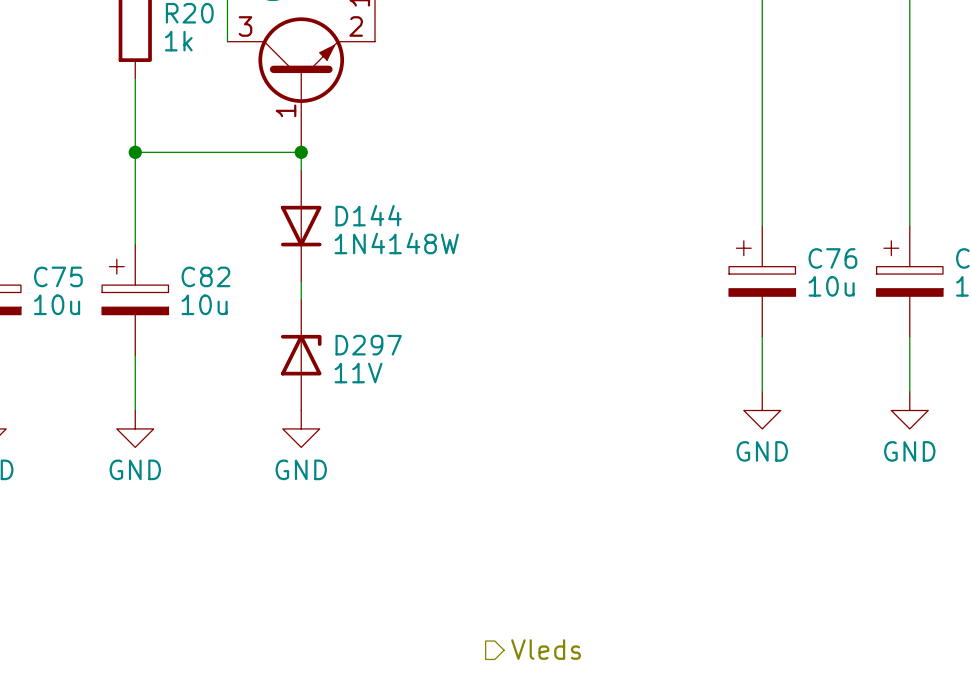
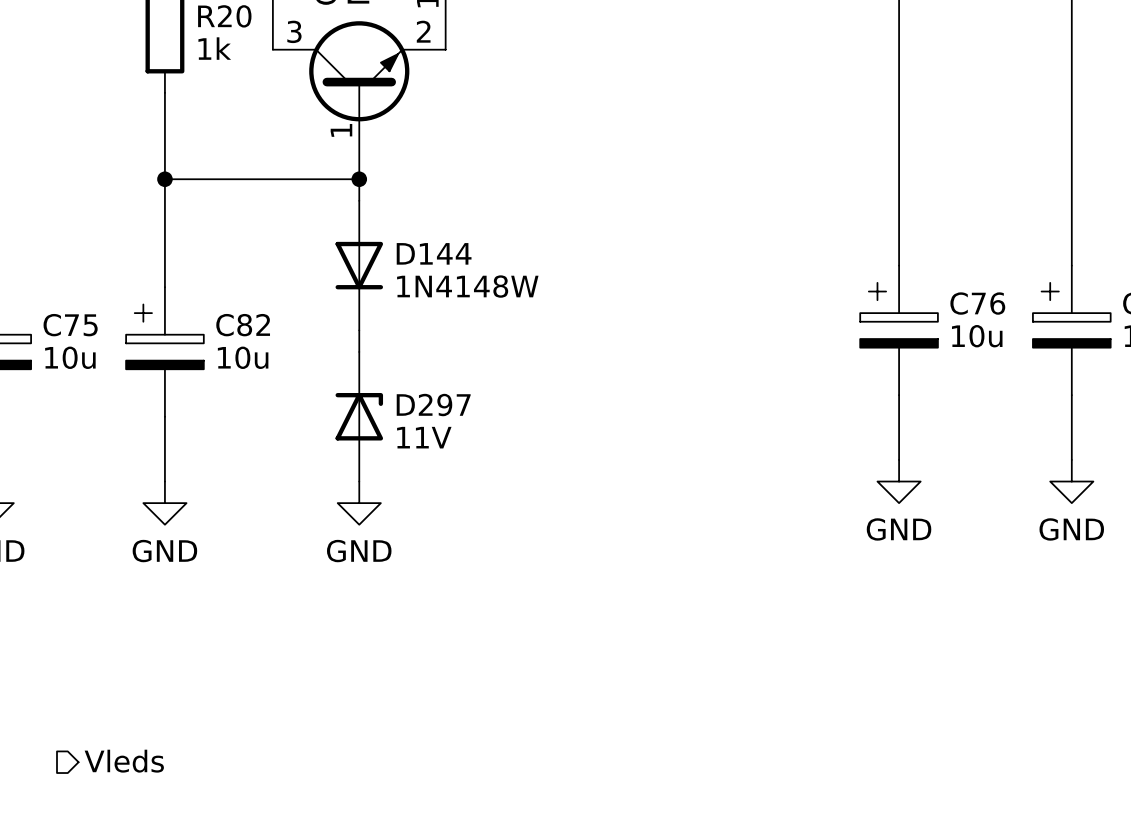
hierarchical label: none -> Vleds (124, 761)
hierarchical label: Vleds (546, 649) -> none

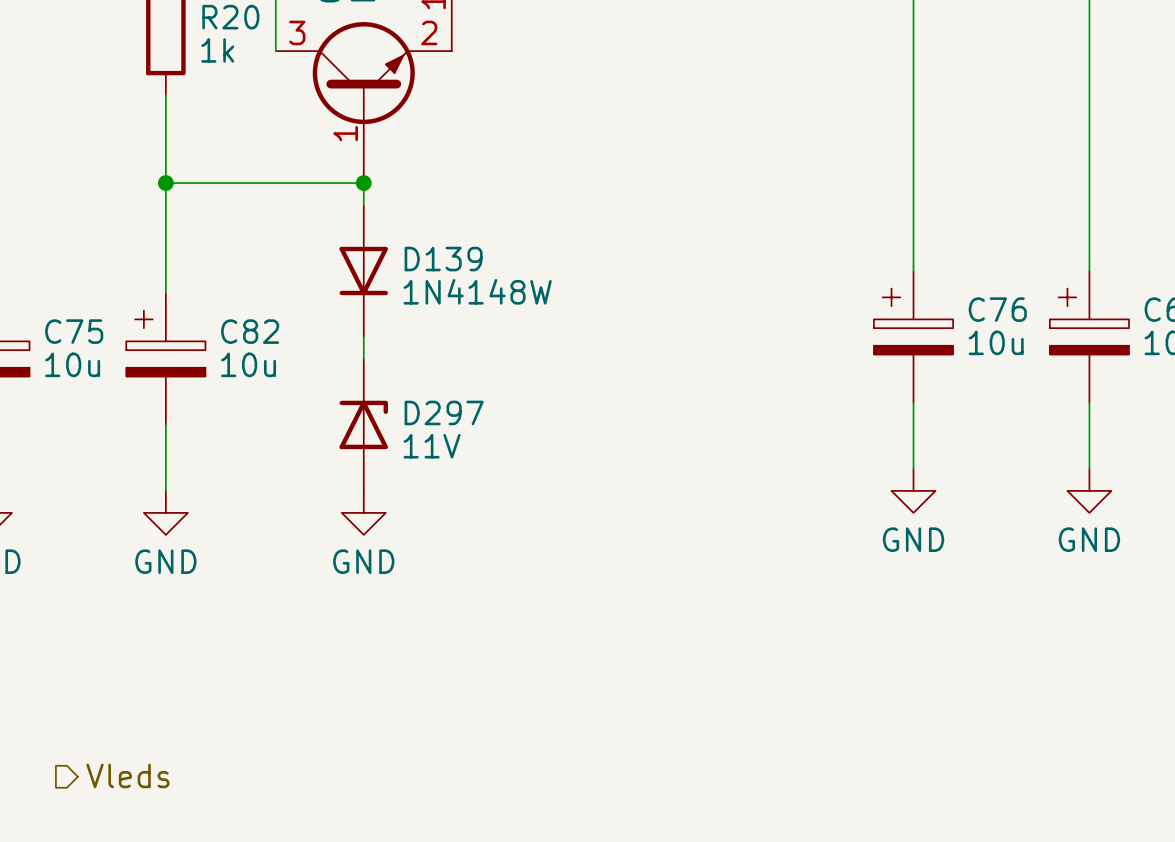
D144 name: D144 (434, 253) -> D139 (443, 259)

